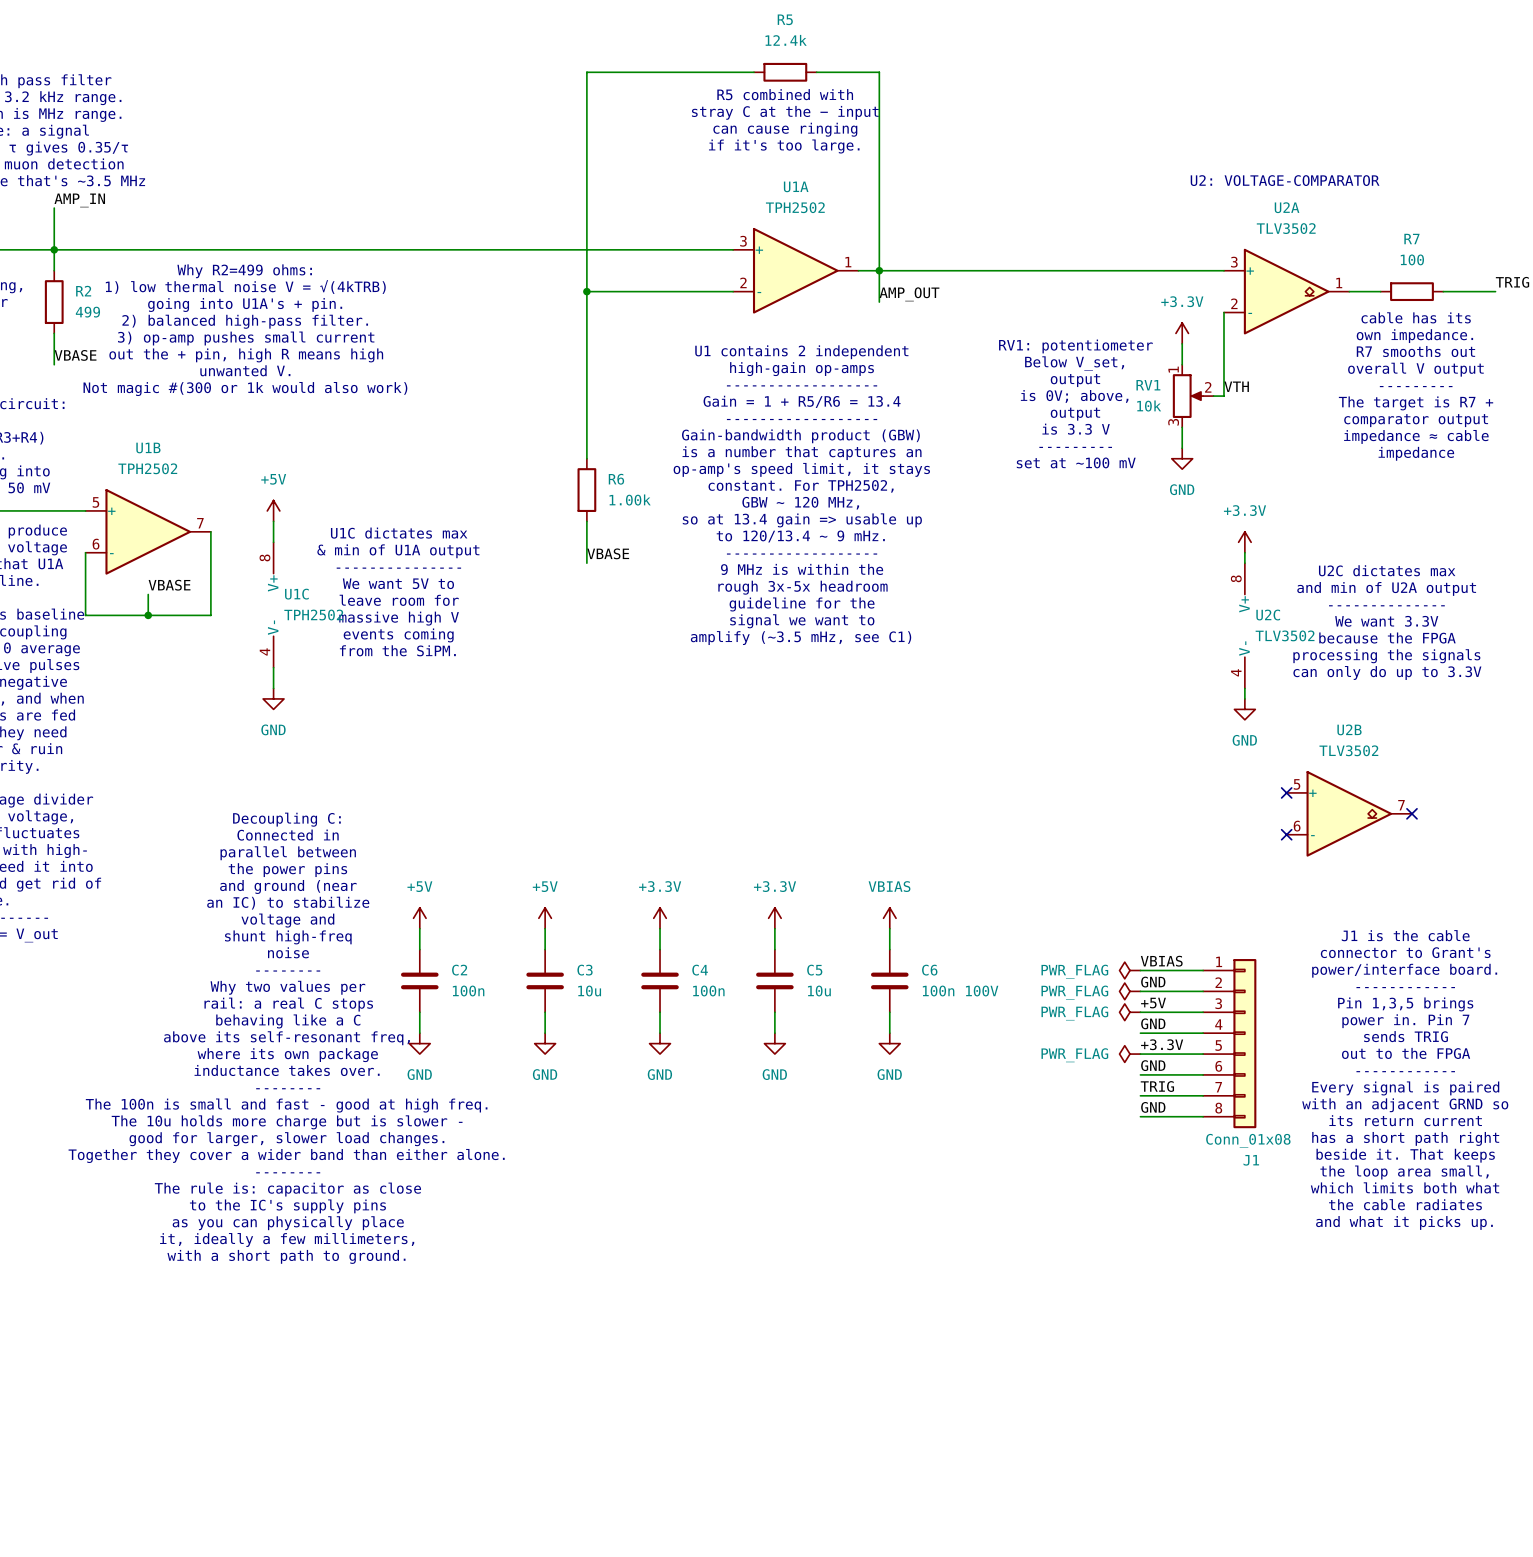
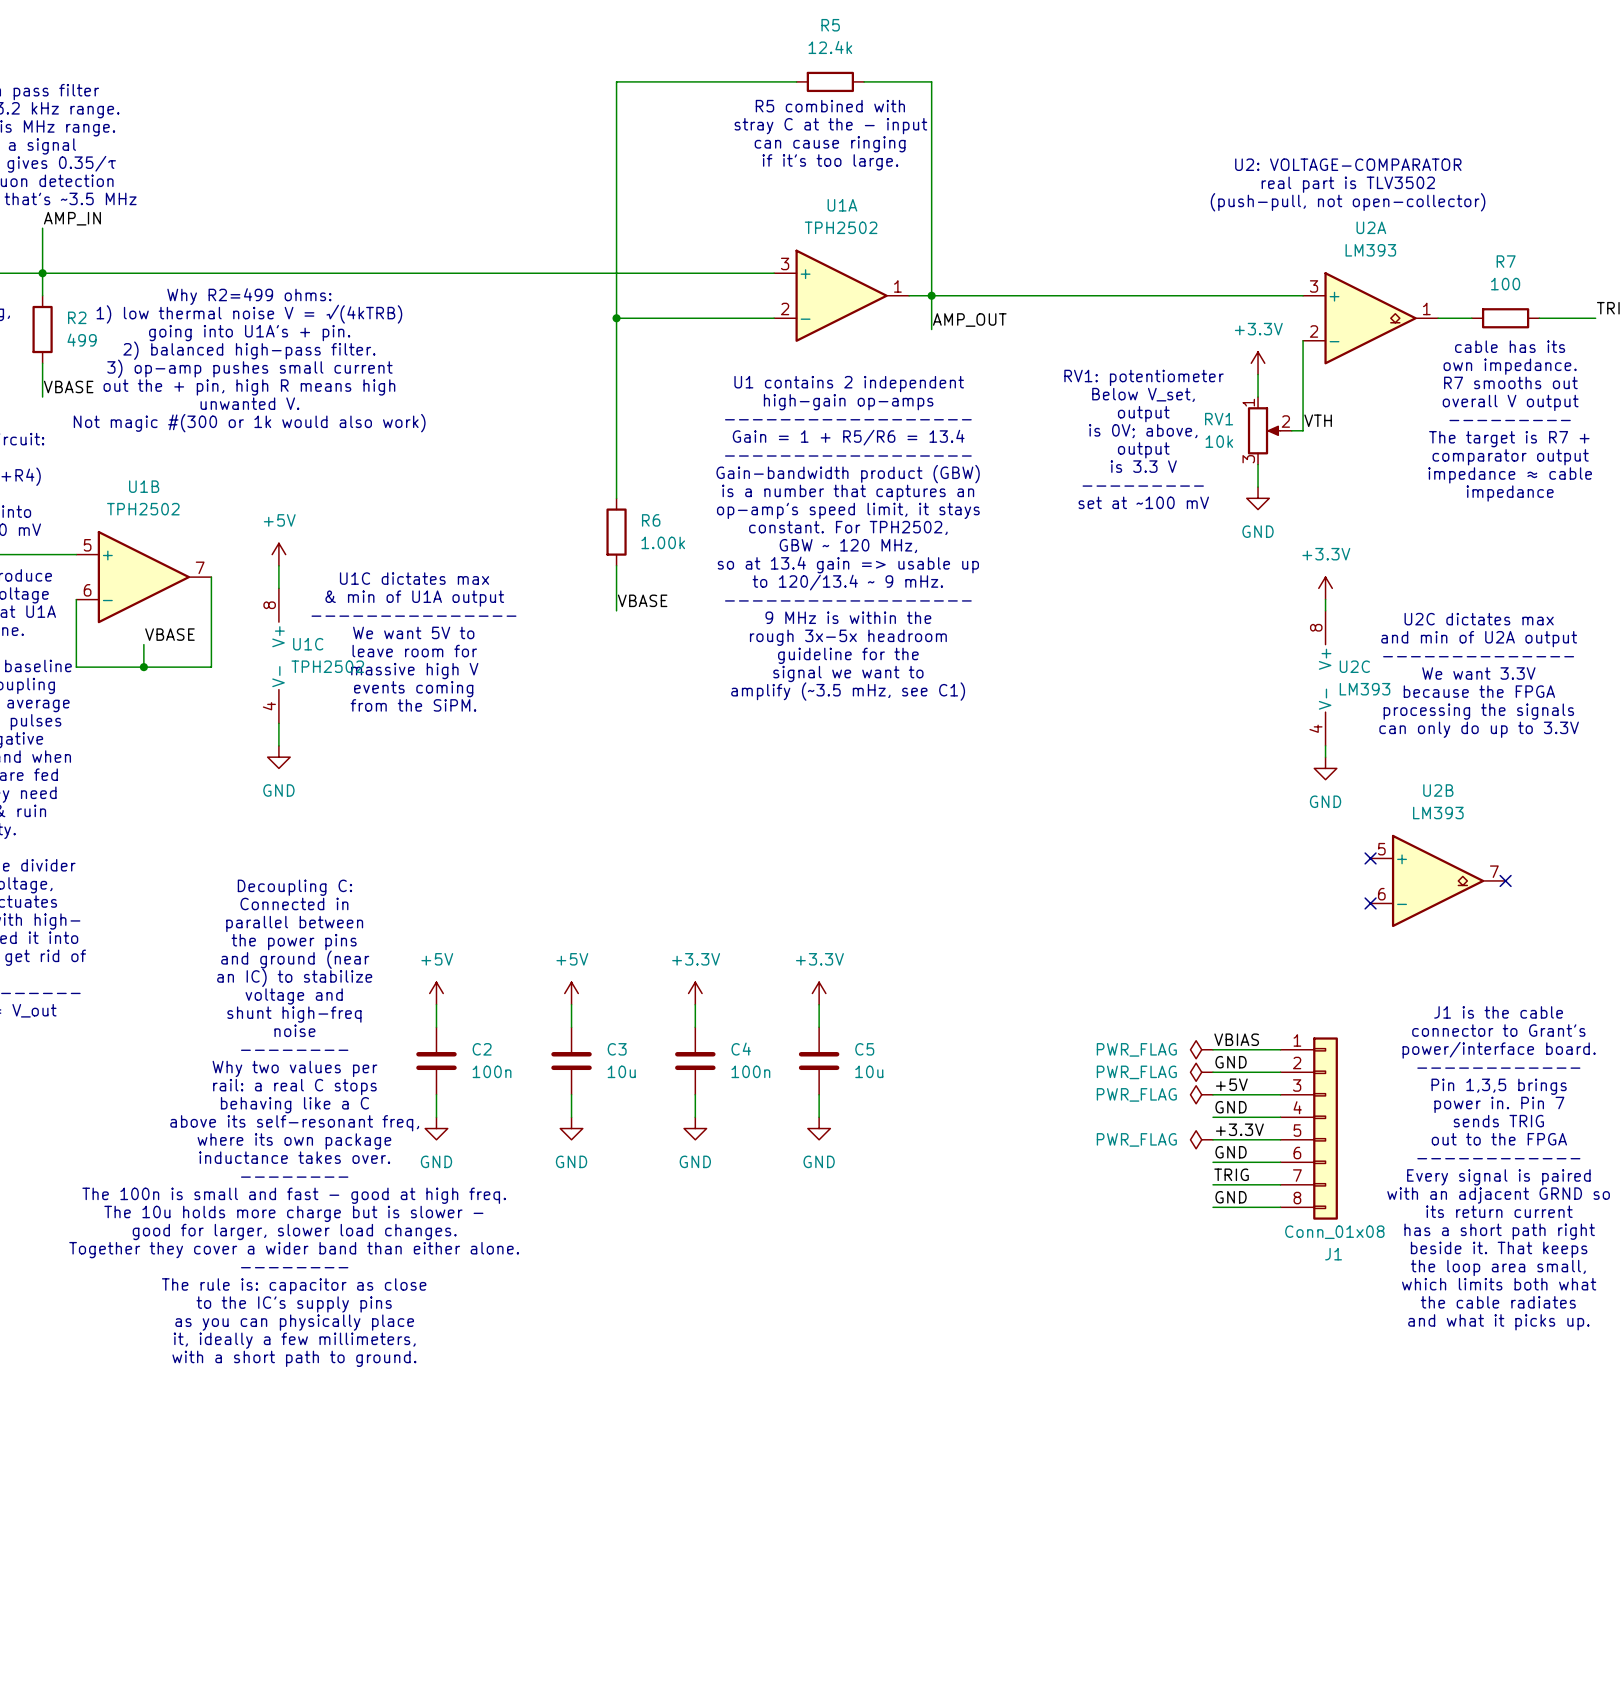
text: none -> real part is TLV3502 (1348, 184)
text position: U2: VOLTAGE-COMPARATOR (1285, 180) -> U2: VOLTAGE-COMPARATOR (1348, 164)
text: none -> (push-pull, not open-collector) (1348, 202)
U2A value: TLV3502 (1286, 228) -> LM393 (1370, 250)
U2C value: TLV3502 (1285, 635) -> LM393 (1365, 689)
U2B value: TLV3502 (1348, 750) -> LM393 (1438, 813)
power symbol: VBIAS (889, 918) -> none
wire: (889, 928) (889, 949) -> none
C6: 100n 100V (889, 980) -> none
wire: (889, 1012) (889, 1033) -> none
power symbol: GND (889, 1043) -> none

